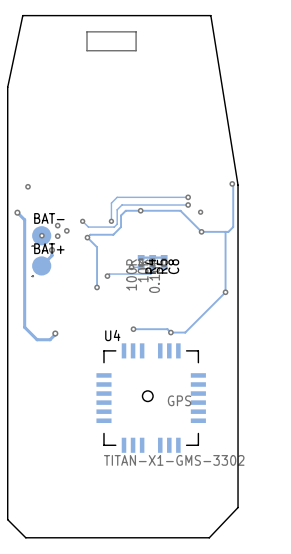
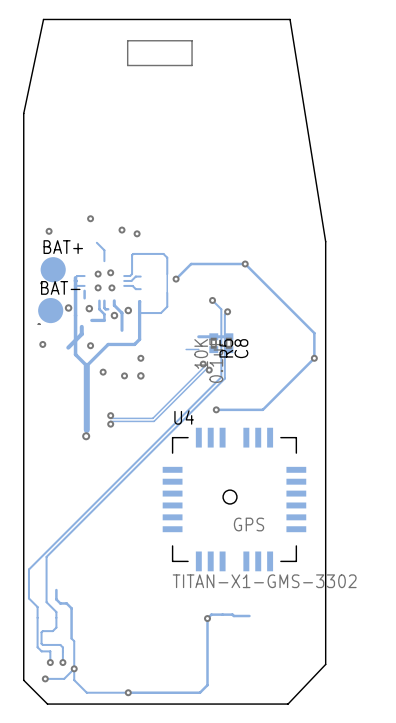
via: none -> (90, 218)
via: none -> (122, 230)
via: none -> (49, 231)
via: none -> (137, 233)
track: (232, 183) (233, 227) (228, 231) (201, 231) (180, 210) (125, 210) (121, 215) (121, 227) (113, 234) (90, 234) (87, 237) (97, 247) (97, 287) -> none
via: (232, 183) -> none
track: none -> (96, 242) (104, 250) (104, 261)
via: (28, 186) -> none
track: (188, 197) (117, 197) (111, 203) (111, 221) -> none
via: (188, 197) -> none
via: none -> (245, 264)
track: (188, 205) (121, 205) (117, 209) -> (124, 276) (132, 274) (133, 253) (163, 253) (167, 257) (167, 274)
via: (188, 205) -> none
via: none -> (110, 272)
via: none -> (98, 274)
via: (140, 210) -> none
track: none -> (84, 276) (77, 276) (75, 280)
track: none -> (140, 276) (135, 276) (131, 280) (124, 280)
track: (17, 212) (24, 219) (24, 327) (37, 339) (50, 339) (55, 333) -> none
via: (17, 212) -> none
via: (200, 212) -> none
track: none -> (176, 279) (191, 264) (245, 264) (314, 333) (314, 358) (262, 409) (216, 409)
track: none -> (75, 281) (75, 354) (86, 365)
track: none -> (84, 285) (75, 285)
track: none -> (124, 285) (132, 285) (135, 289) (140, 289)
via: none -> (98, 287)
via: none -> (111, 287)
track: (82, 221) (88, 227) (114, 227) (117, 224) -> (139, 313) (160, 313) (167, 306) (167, 292)
via: (82, 221) -> none
via position: (111, 221) -> (176, 279)
track: none -> (84, 290) (84, 298)
via: (57, 225) -> none
track: none -> (212, 300) (221, 309) (221, 377) (28, 569) (28, 598) (37, 607) (37, 647) (41, 651) (50, 651) (50, 662)
via: none -> (212, 300)
track: none -> (99, 300) (99, 309) (104, 314) (104, 320) (91, 320)
via: (66, 230) -> none
track: none -> (104, 300) (104, 308) (108, 309)
track: none -> (114, 300) (114, 305) (122, 313) (122, 330)
track: none -> (139, 301) (139, 339) (134, 344) (108, 344) (86, 365)
via: (201, 231) -> none
track: (225, 231) (225, 292) (185, 332) (170, 332) (167, 329) (133, 329) -> none
BAT- position: (41, 235) -> (50, 310)
track: none -> (227, 311) (224, 314) (224, 378) (46, 556) (46, 602) (56, 612) (56, 627) (52, 631) (41, 632) (41, 643) (60, 644) (62, 647) (62, 662)
via: none -> (227, 311)
via: none -> (114, 315)
via: (51, 250) -> none
R4: 100R (141, 262) -> none
via: none -> (42, 344)
via: none -> (90, 345)
BAT+ position: (41, 265) -> (53, 269)
via: (131, 267) -> none
track: (152, 267) (150, 274) (109, 274) (107, 276) -> none
via: none -> (140, 358)
via: none -> (314, 358)
via: (107, 276) -> none
track: none -> (203, 364) (205, 366) (152, 418) (110, 418) (110, 415)
via: none -> (203, 364)
track: none -> (86, 365) (86, 429)
track: none -> (209, 370) (207, 368) (154, 421) (110, 421) (110, 424)
via: none -> (209, 370)
via: none -> (103, 372)
via: none -> (124, 375)
via: (225, 292) -> none
via: none -> (216, 409)
via: none -> (110, 415)
via: none -> (110, 424)
via: (133, 329) -> none
via: (170, 332) -> none
U4 position: (151, 398) -> (234, 499)
track: none -> (56, 590) (56, 599) (60, 603) (66, 603) (71, 608) (74, 680) (86, 692) (199, 692) (207, 685) (207, 618) (211, 614) (249, 616)
via: none -> (207, 618)
via: none -> (50, 662)
via: none -> (62, 662)
track: none -> (74, 668) (64, 678) (45, 678)
via: none -> (74, 668)
via: none -> (45, 678)
via: none -> (128, 692)

